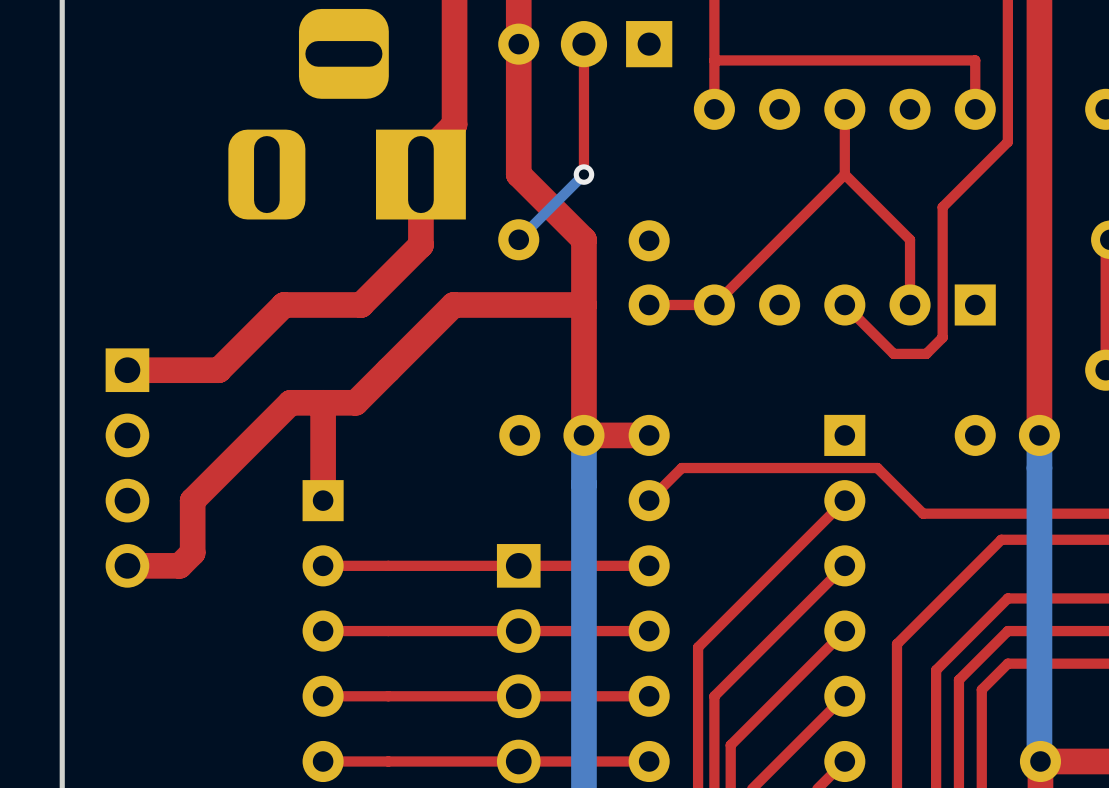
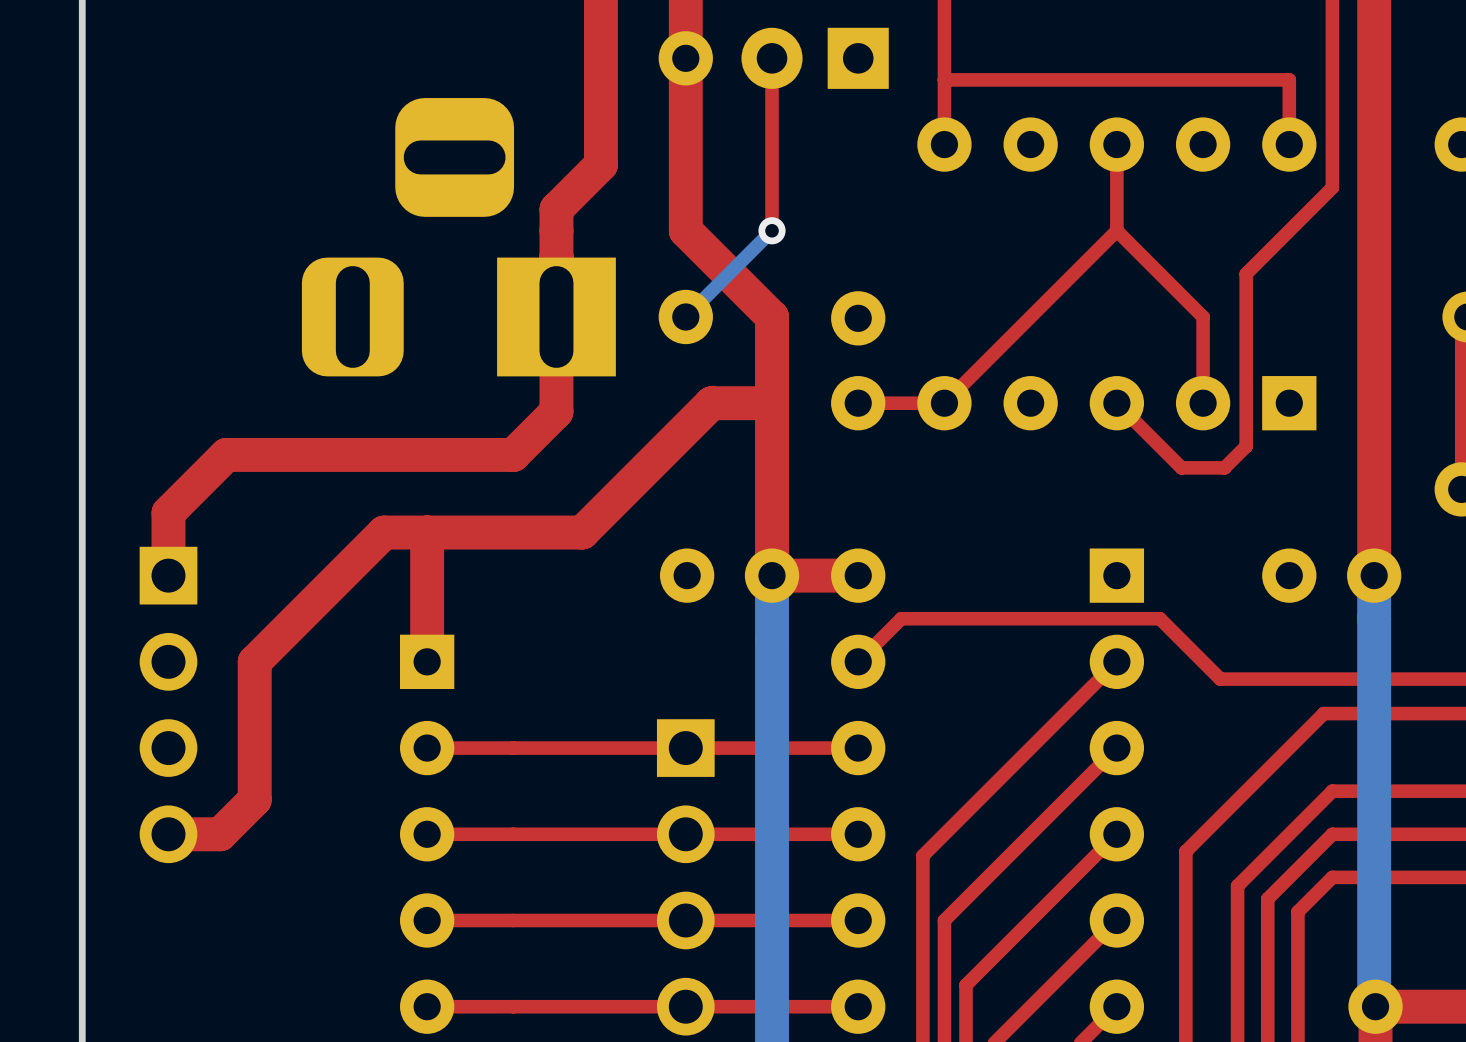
part position: (347, 114) -> (458, 237)
top track: (420, 245) (361, 304) (283, 304) (218, 370) (127, 370) -> (556, 324) (556, 411) (513, 454) (226, 454) (168, 512) (168, 575)
top track: (538, 304) (453, 304) (355, 402) -> (711, 403) (582, 532) (470, 532)
part position: (127, 468) -> (168, 704)
top track: (192, 552) (179, 565) (127, 565) -> (254, 730) (254, 799) (220, 834) (168, 834)

